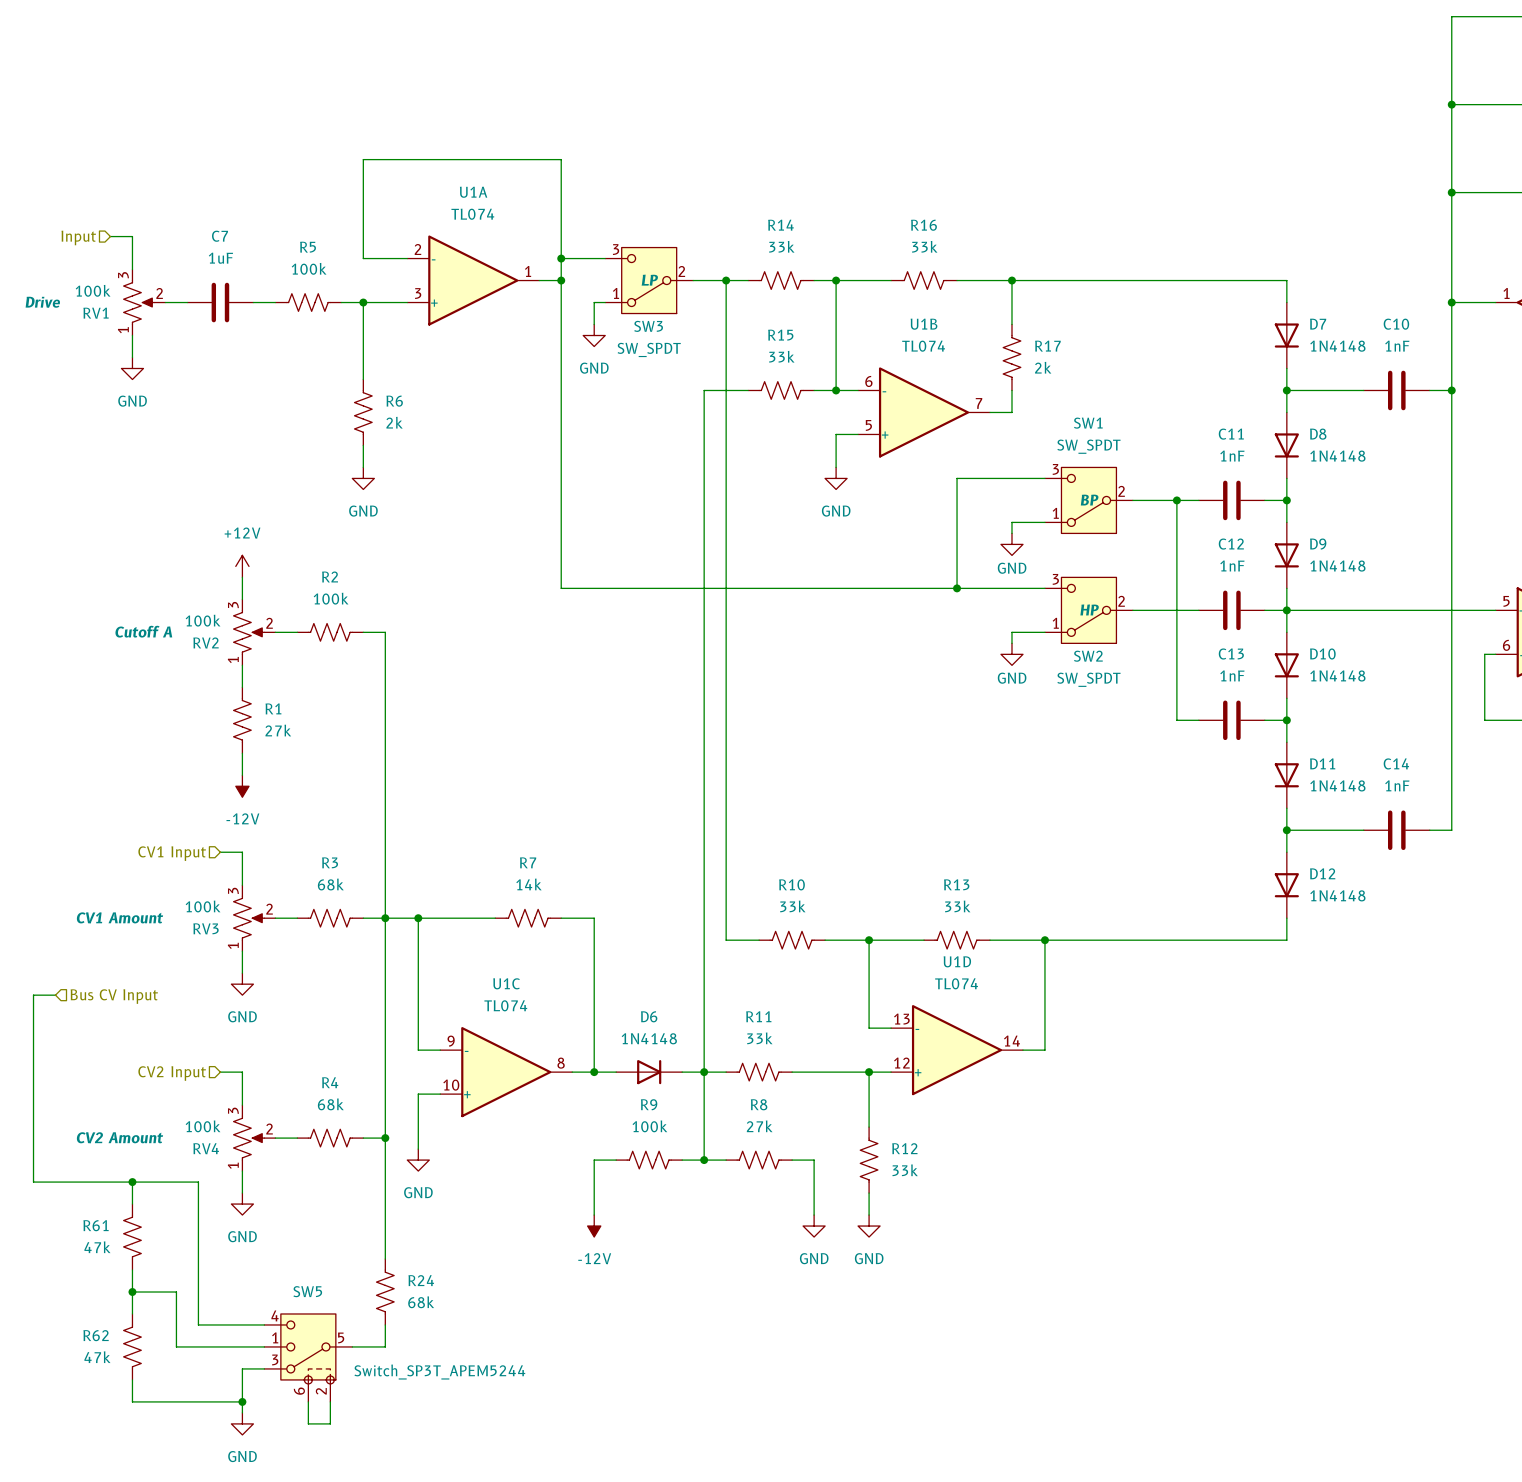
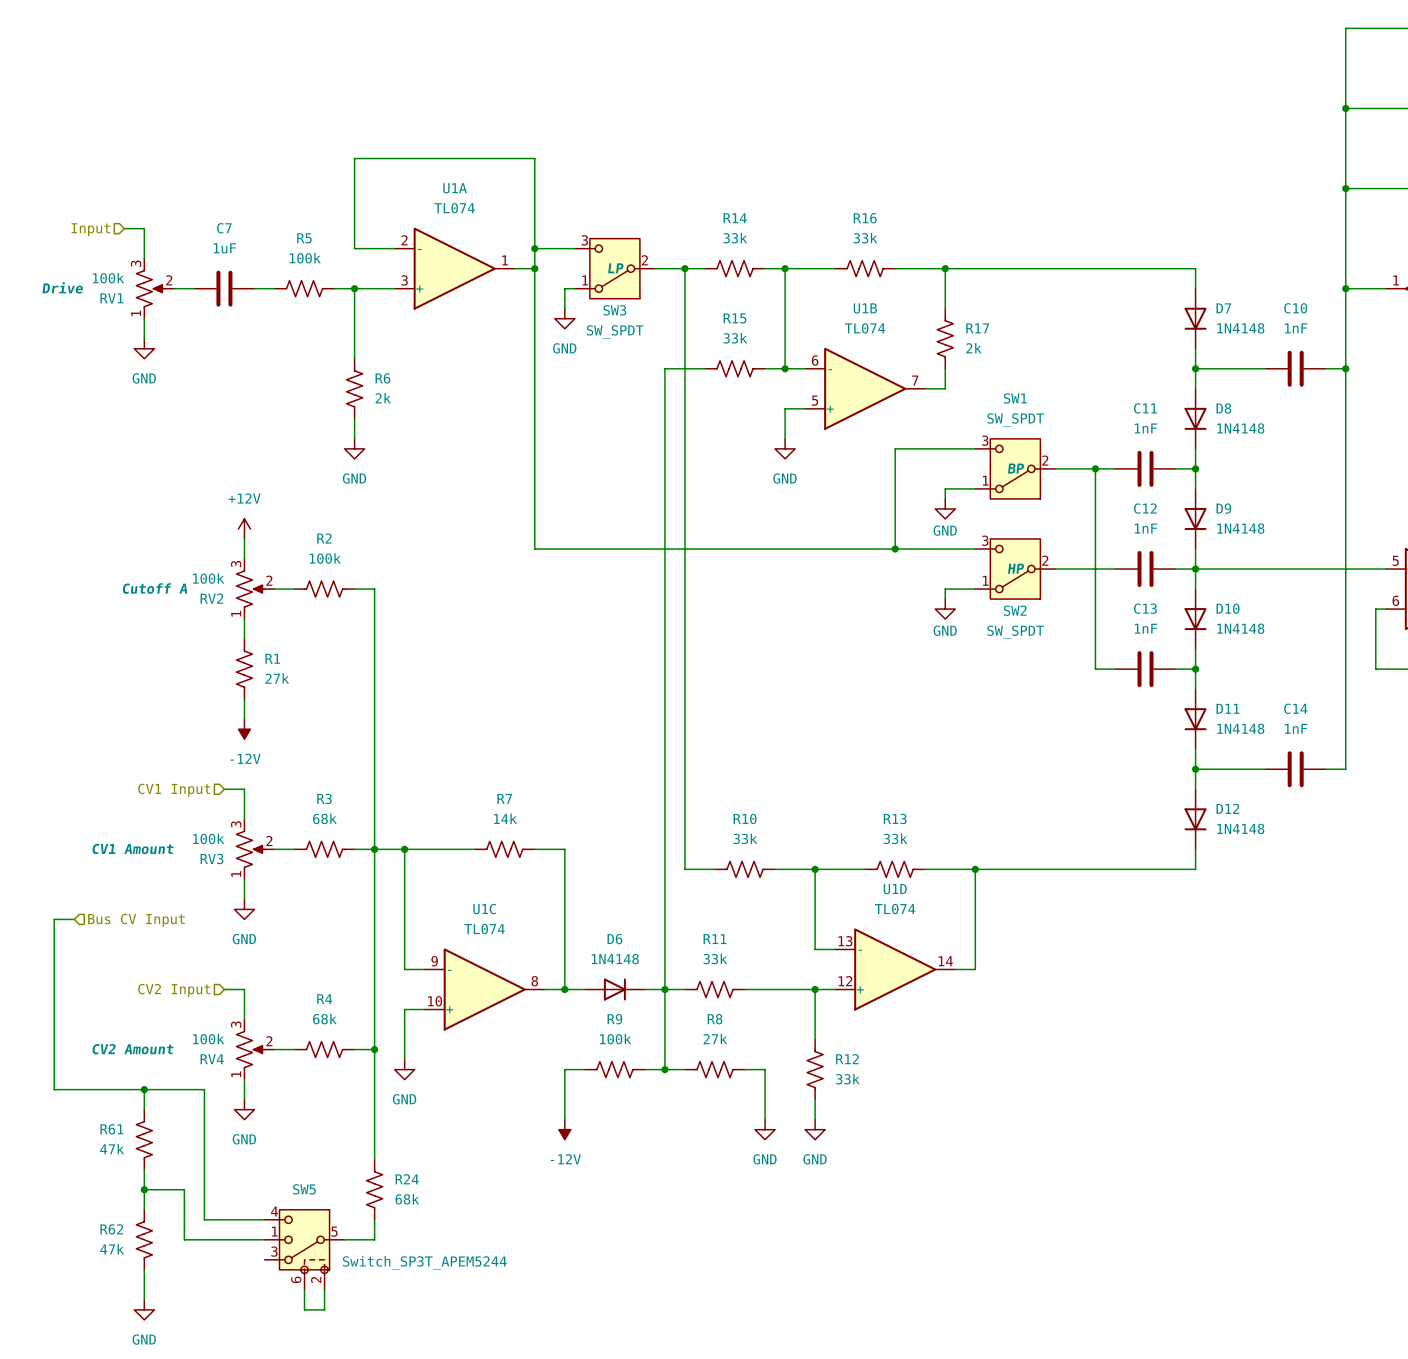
wire: (264, 1368) (242, 1368) (242, 1412) -> none
wire: (132, 1401) (242, 1401) -> (144, 1289) (144, 1299)
junction: (242, 1401) -> none
power symbol position: GND (242, 1423) -> GND (144, 1309)

